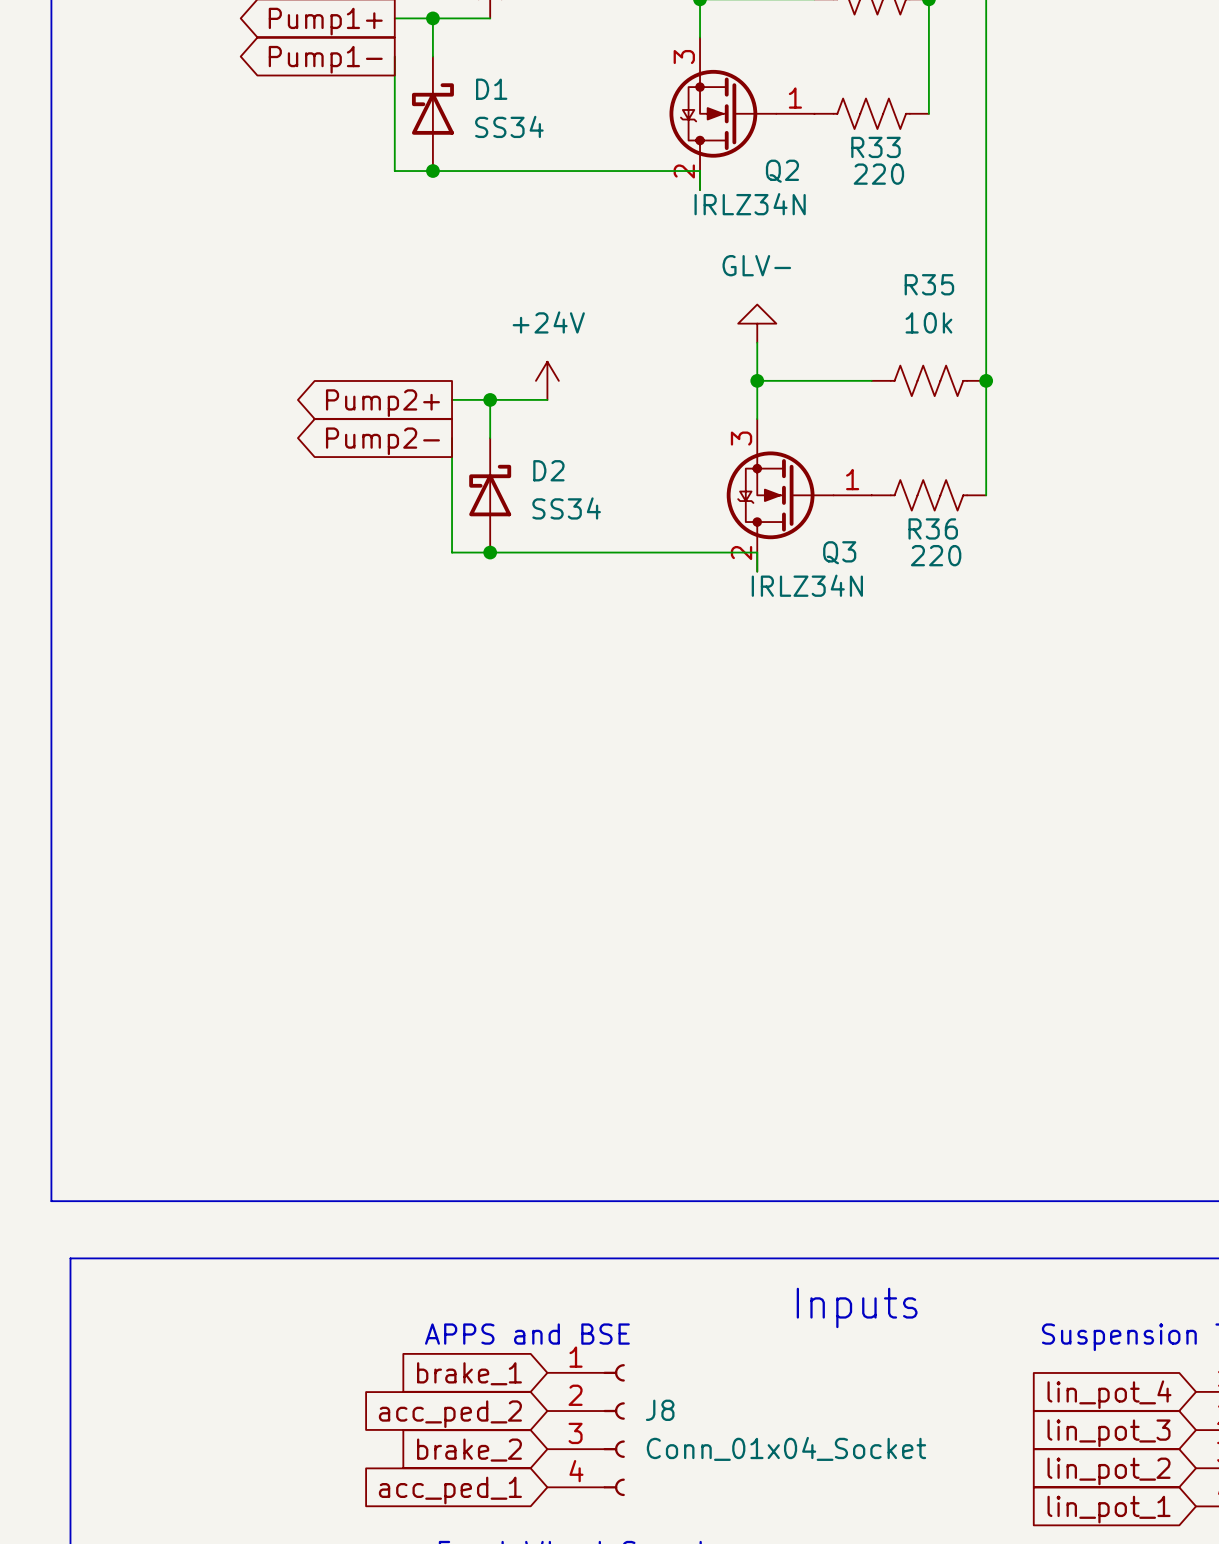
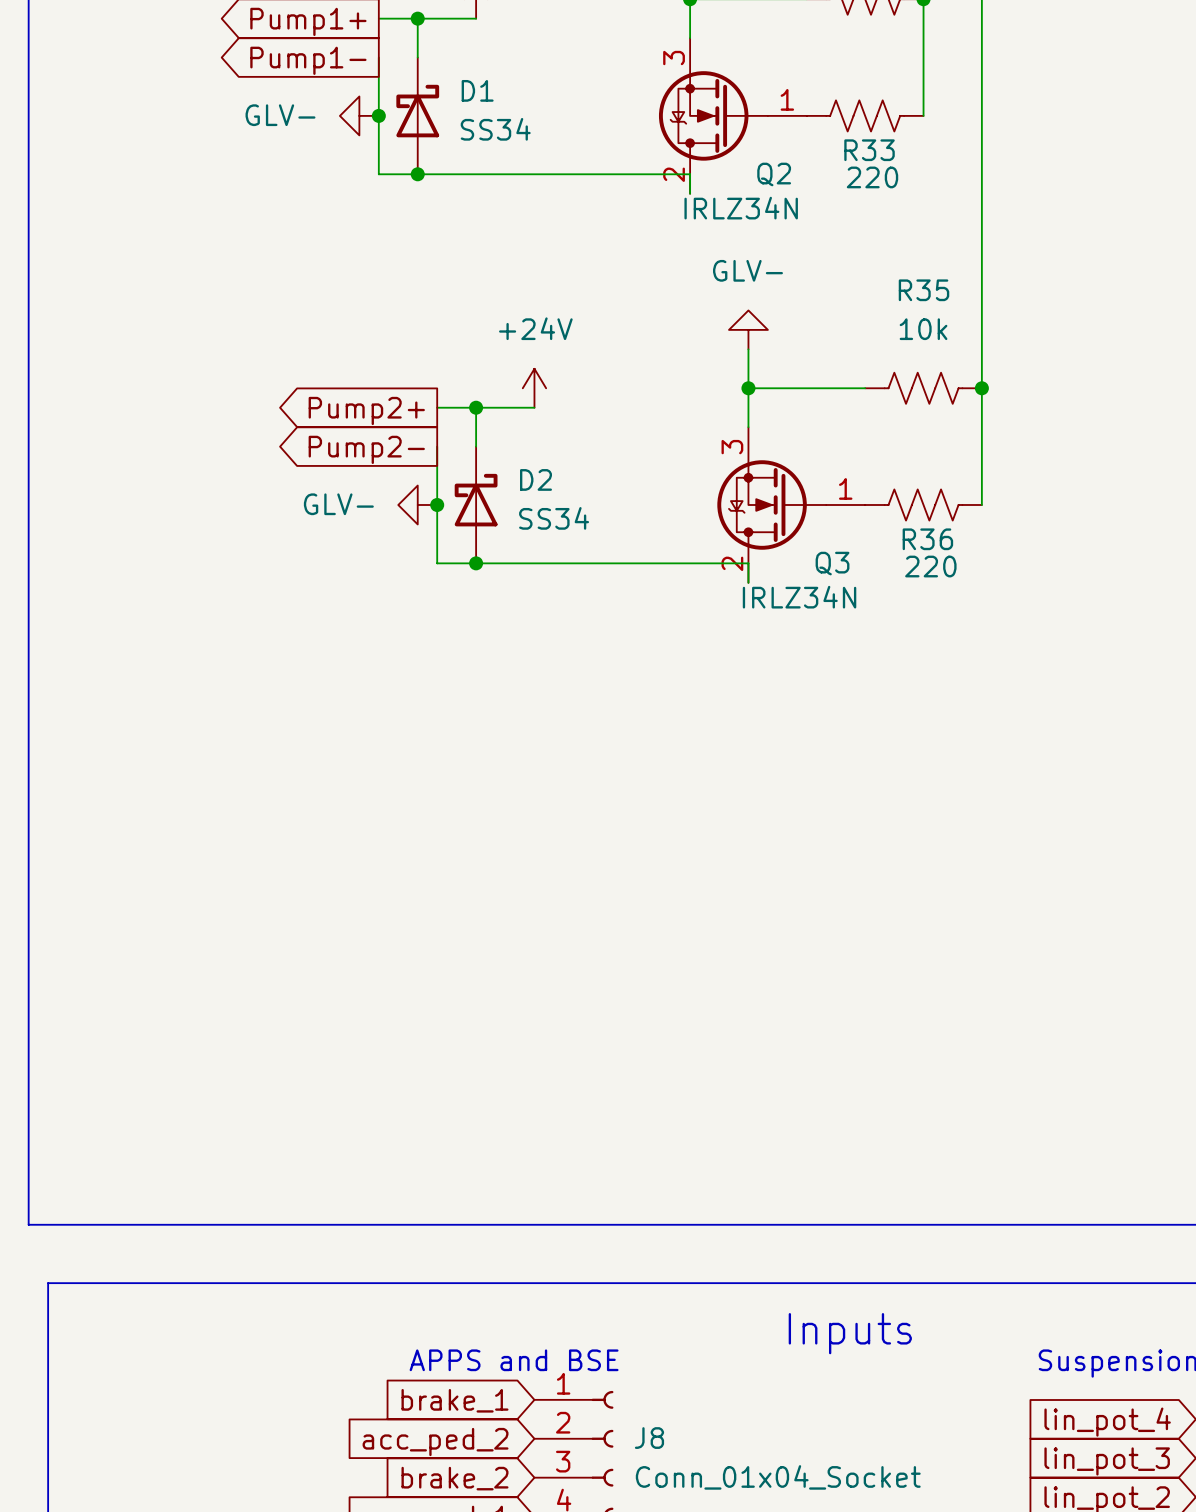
power symbol: none -> GLV- (359, 115)
junction: none -> (378, 115)
power symbol: none -> GLV- (417, 504)
junction: none -> (437, 504)

